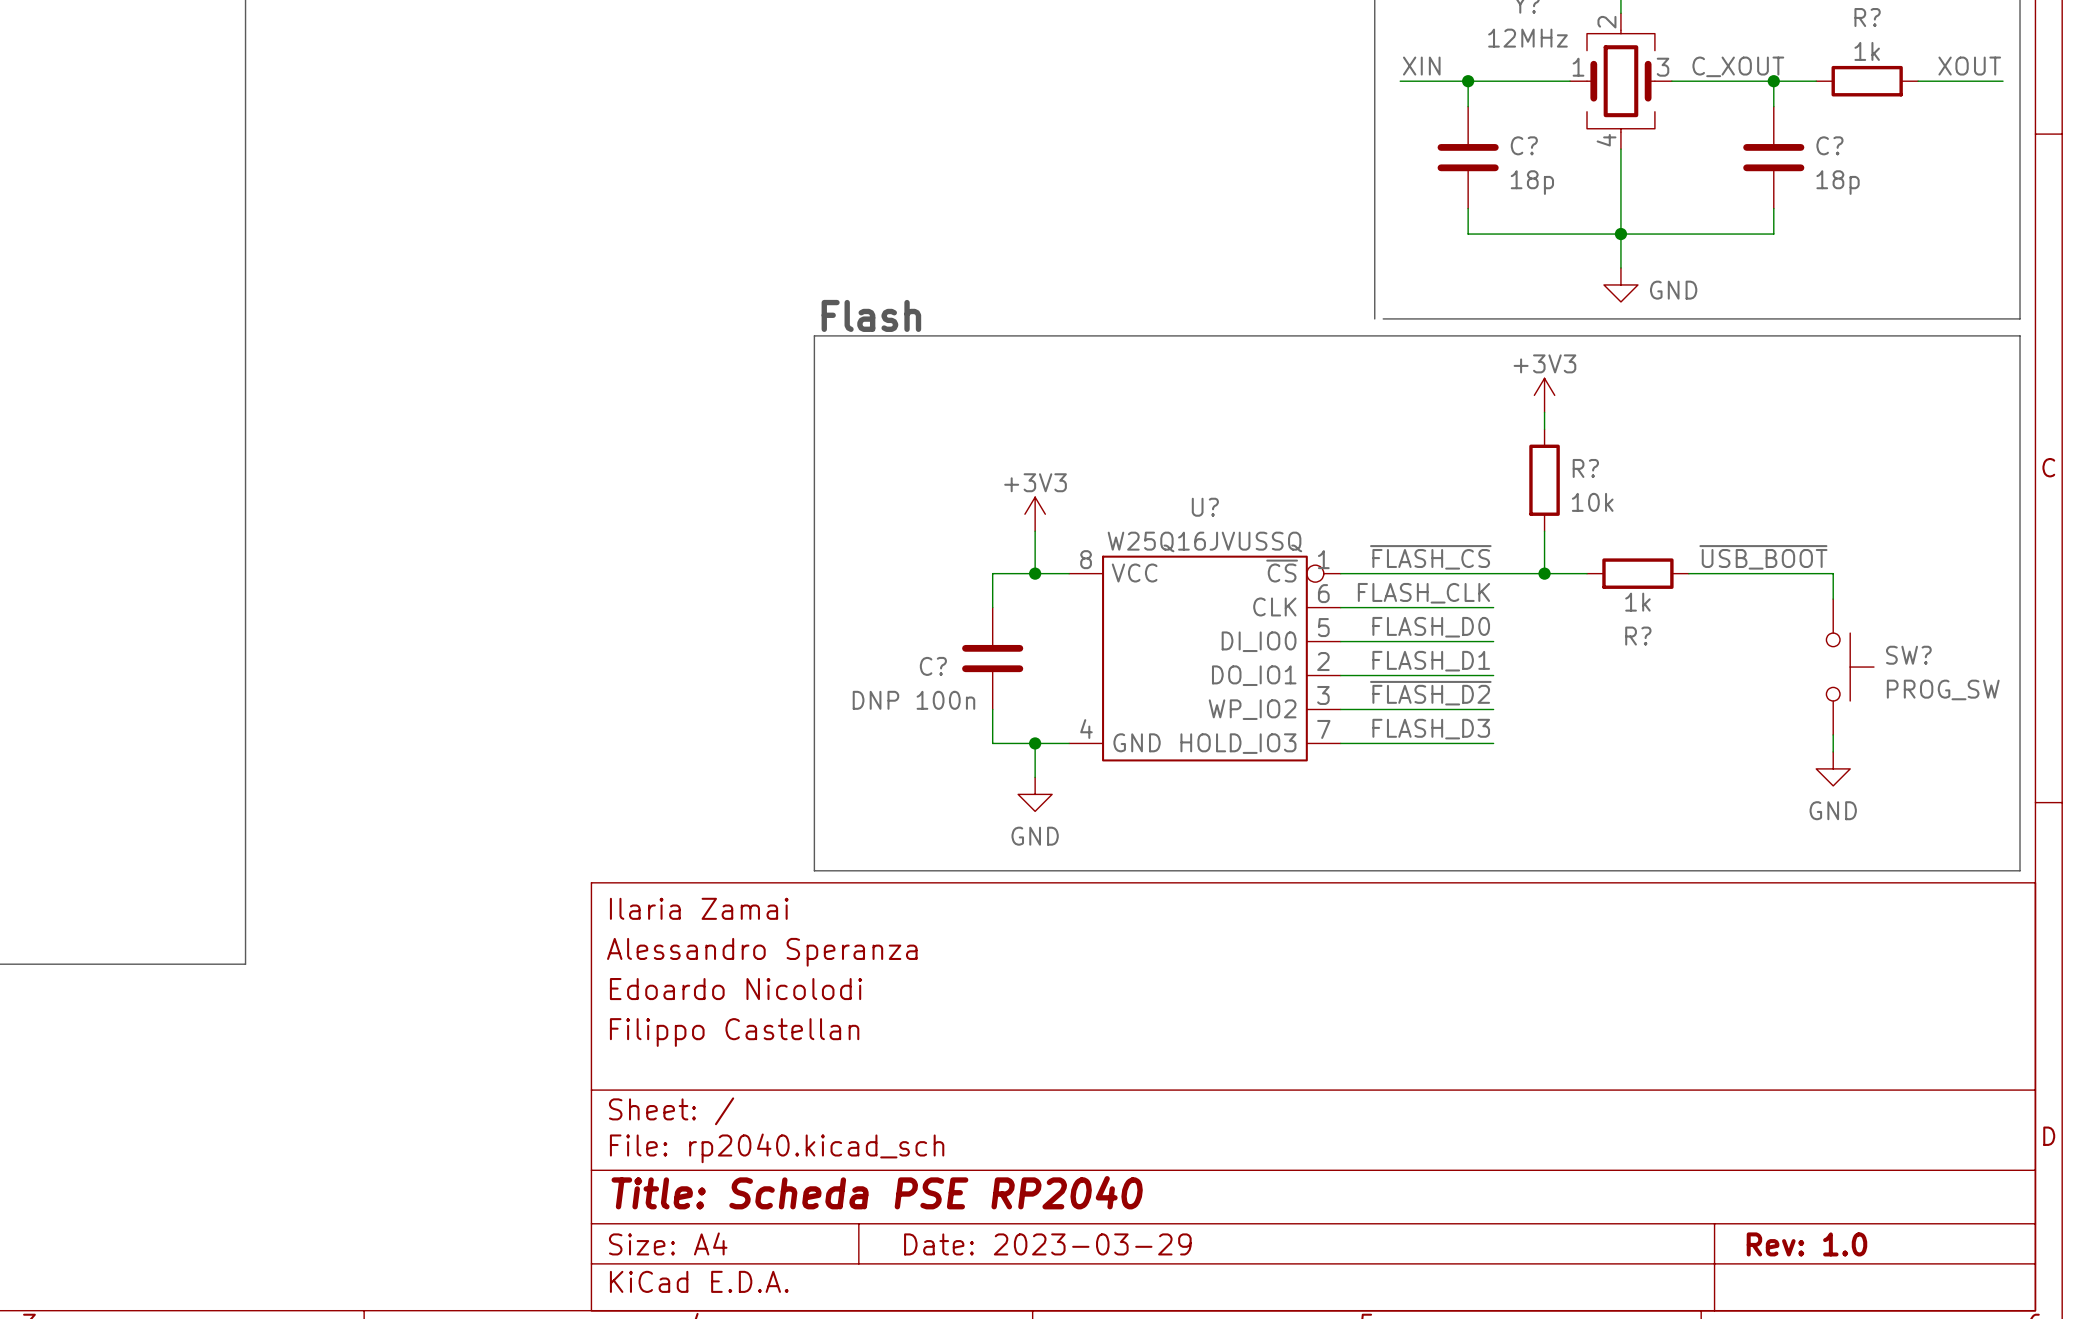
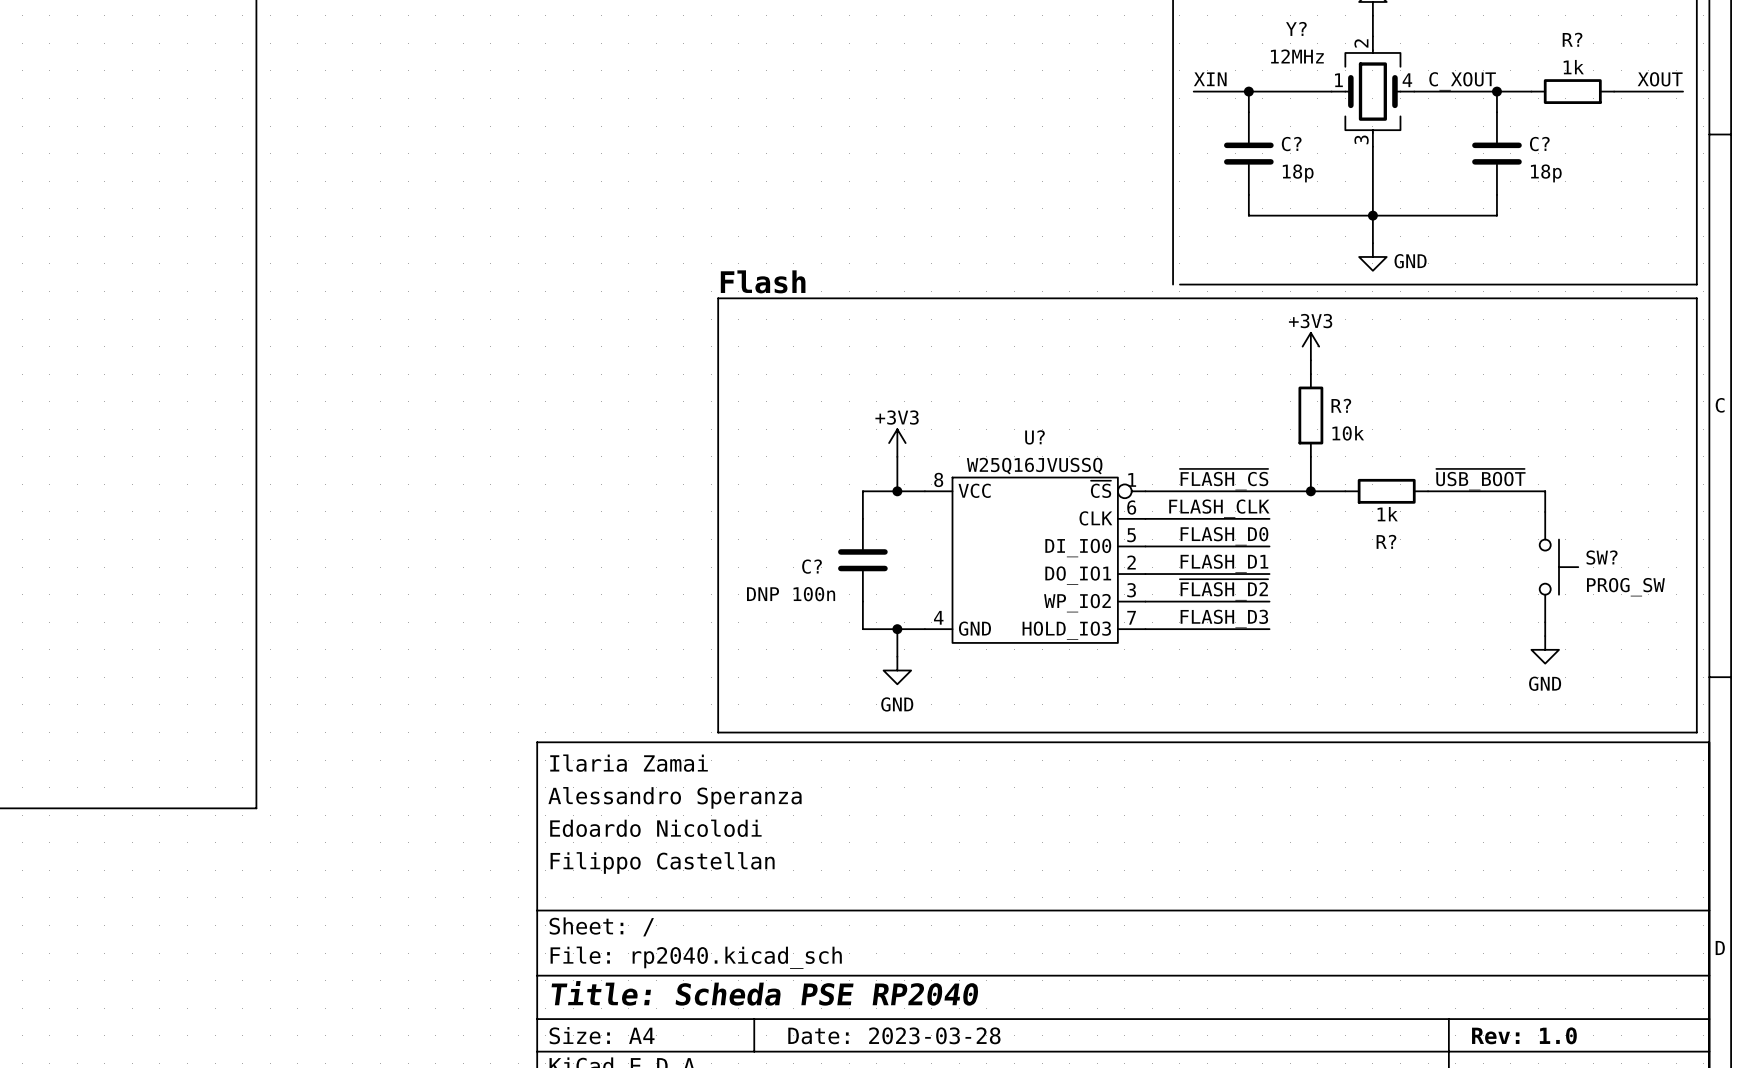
Y? pin number: 3 (1663, 67) -> 4 (1407, 80)
Y? pin number: 4 (1606, 140) -> 3 (1361, 139)
title block: Date: 2023-03-29 (1047, 1244) -> Date: 2023-03-28 (894, 1035)

